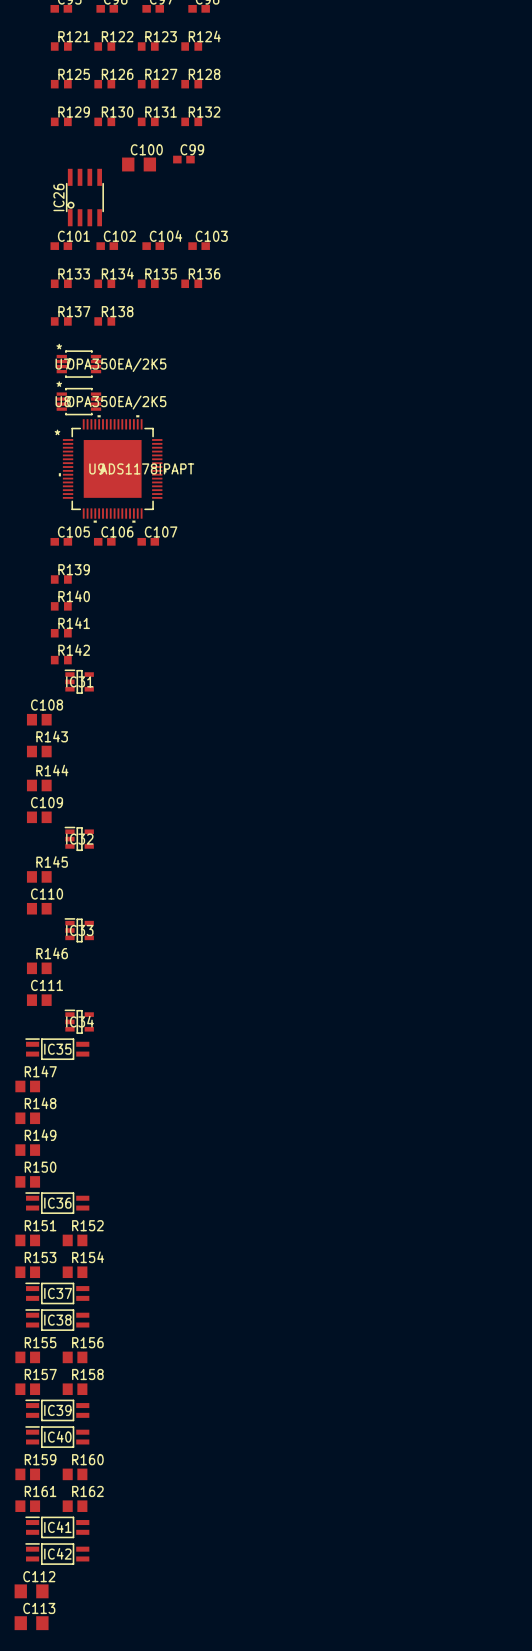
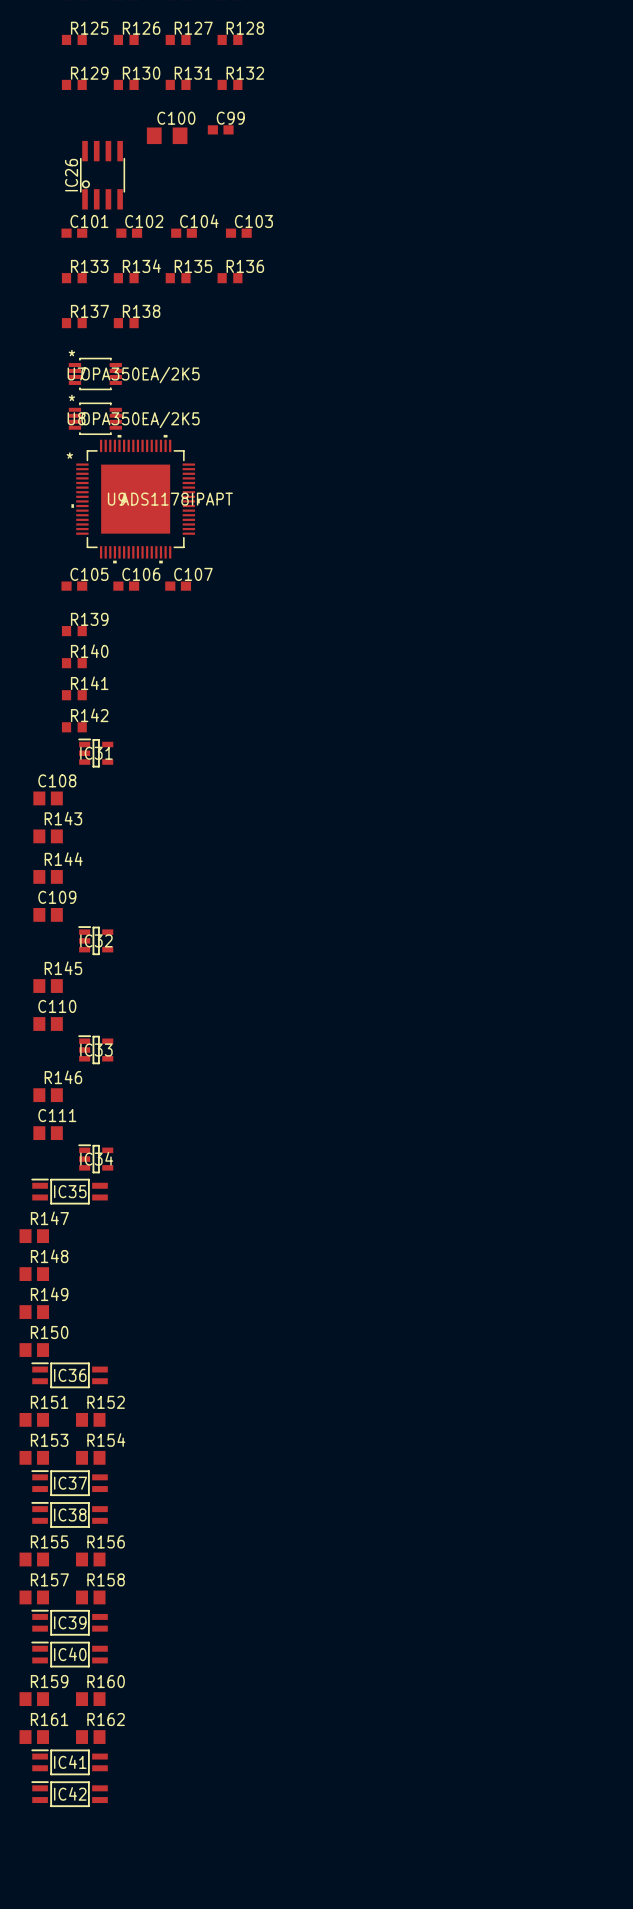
C112: (31, 1591) -> none
C113: (31, 1623) -> none

